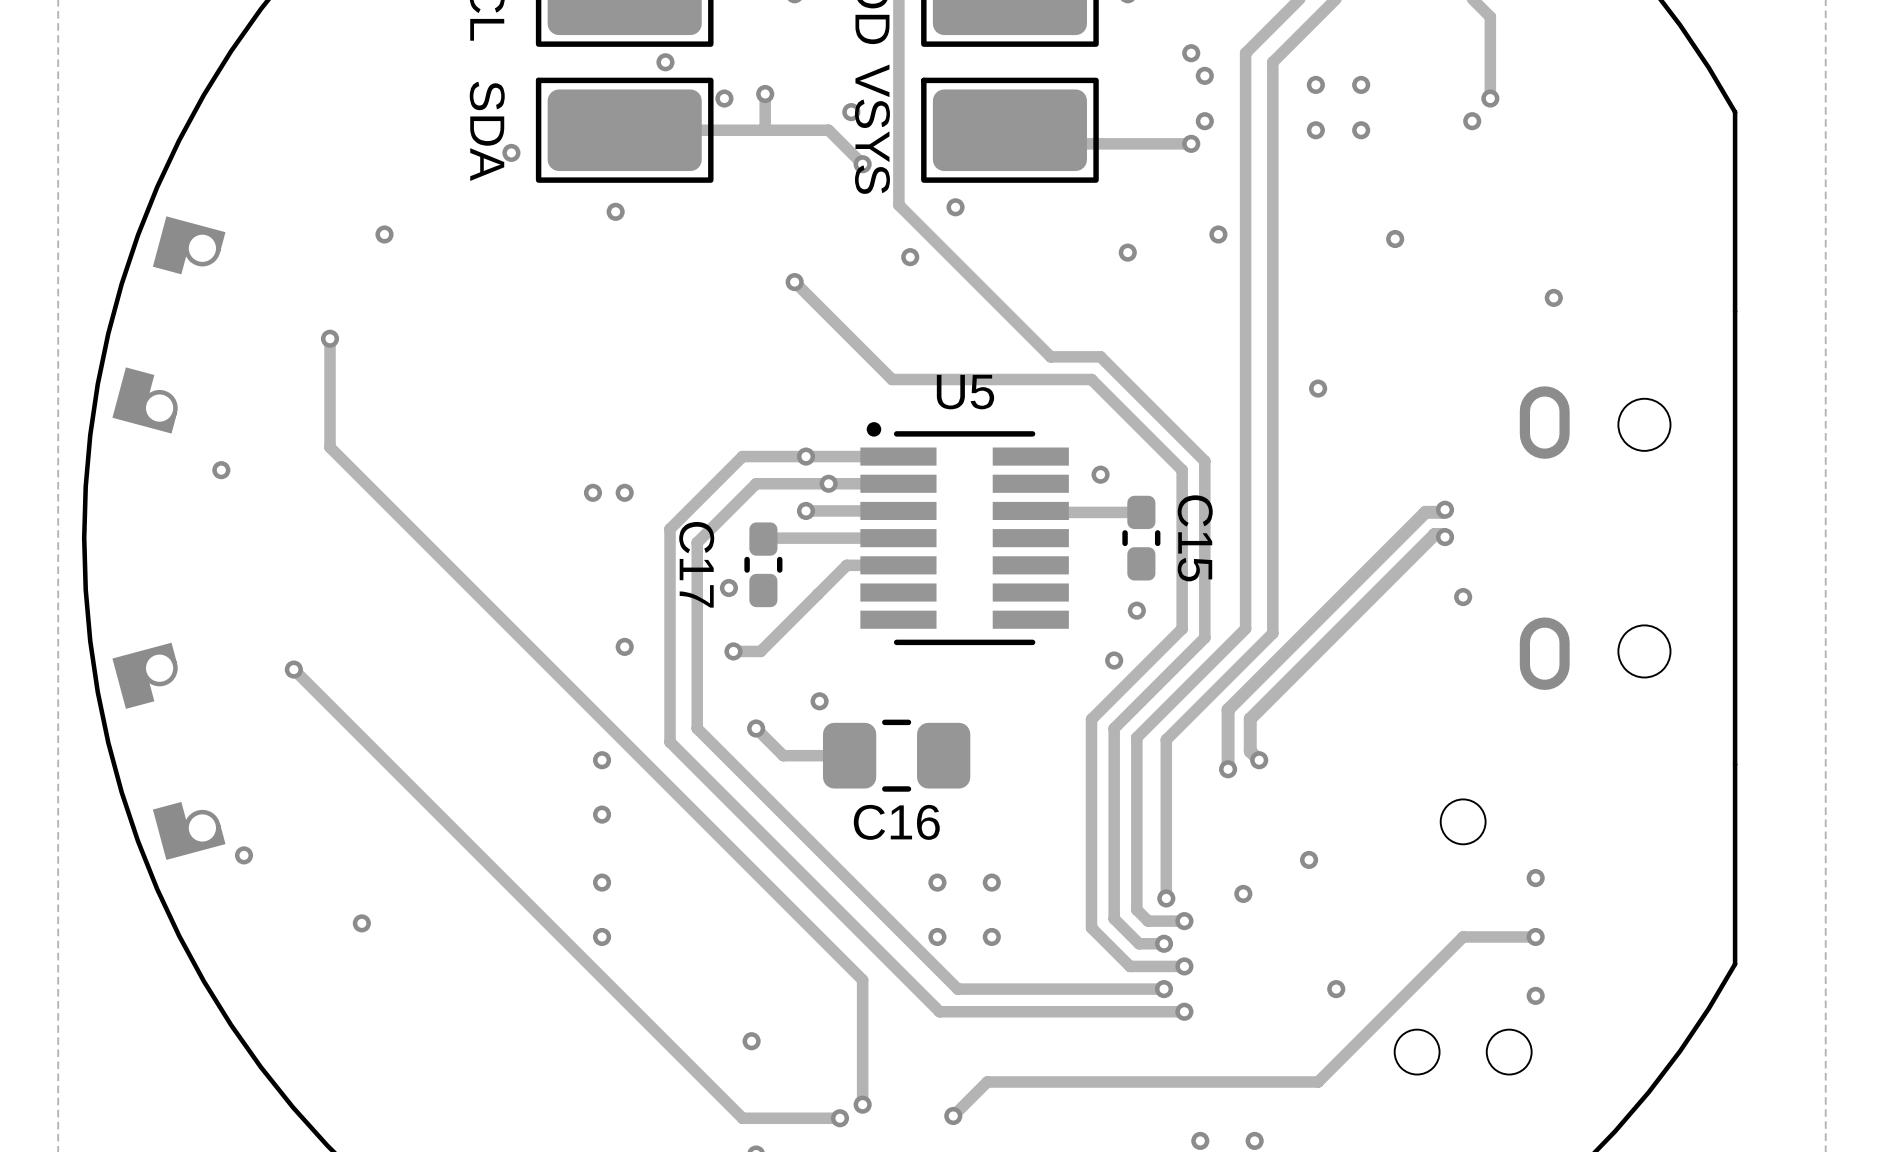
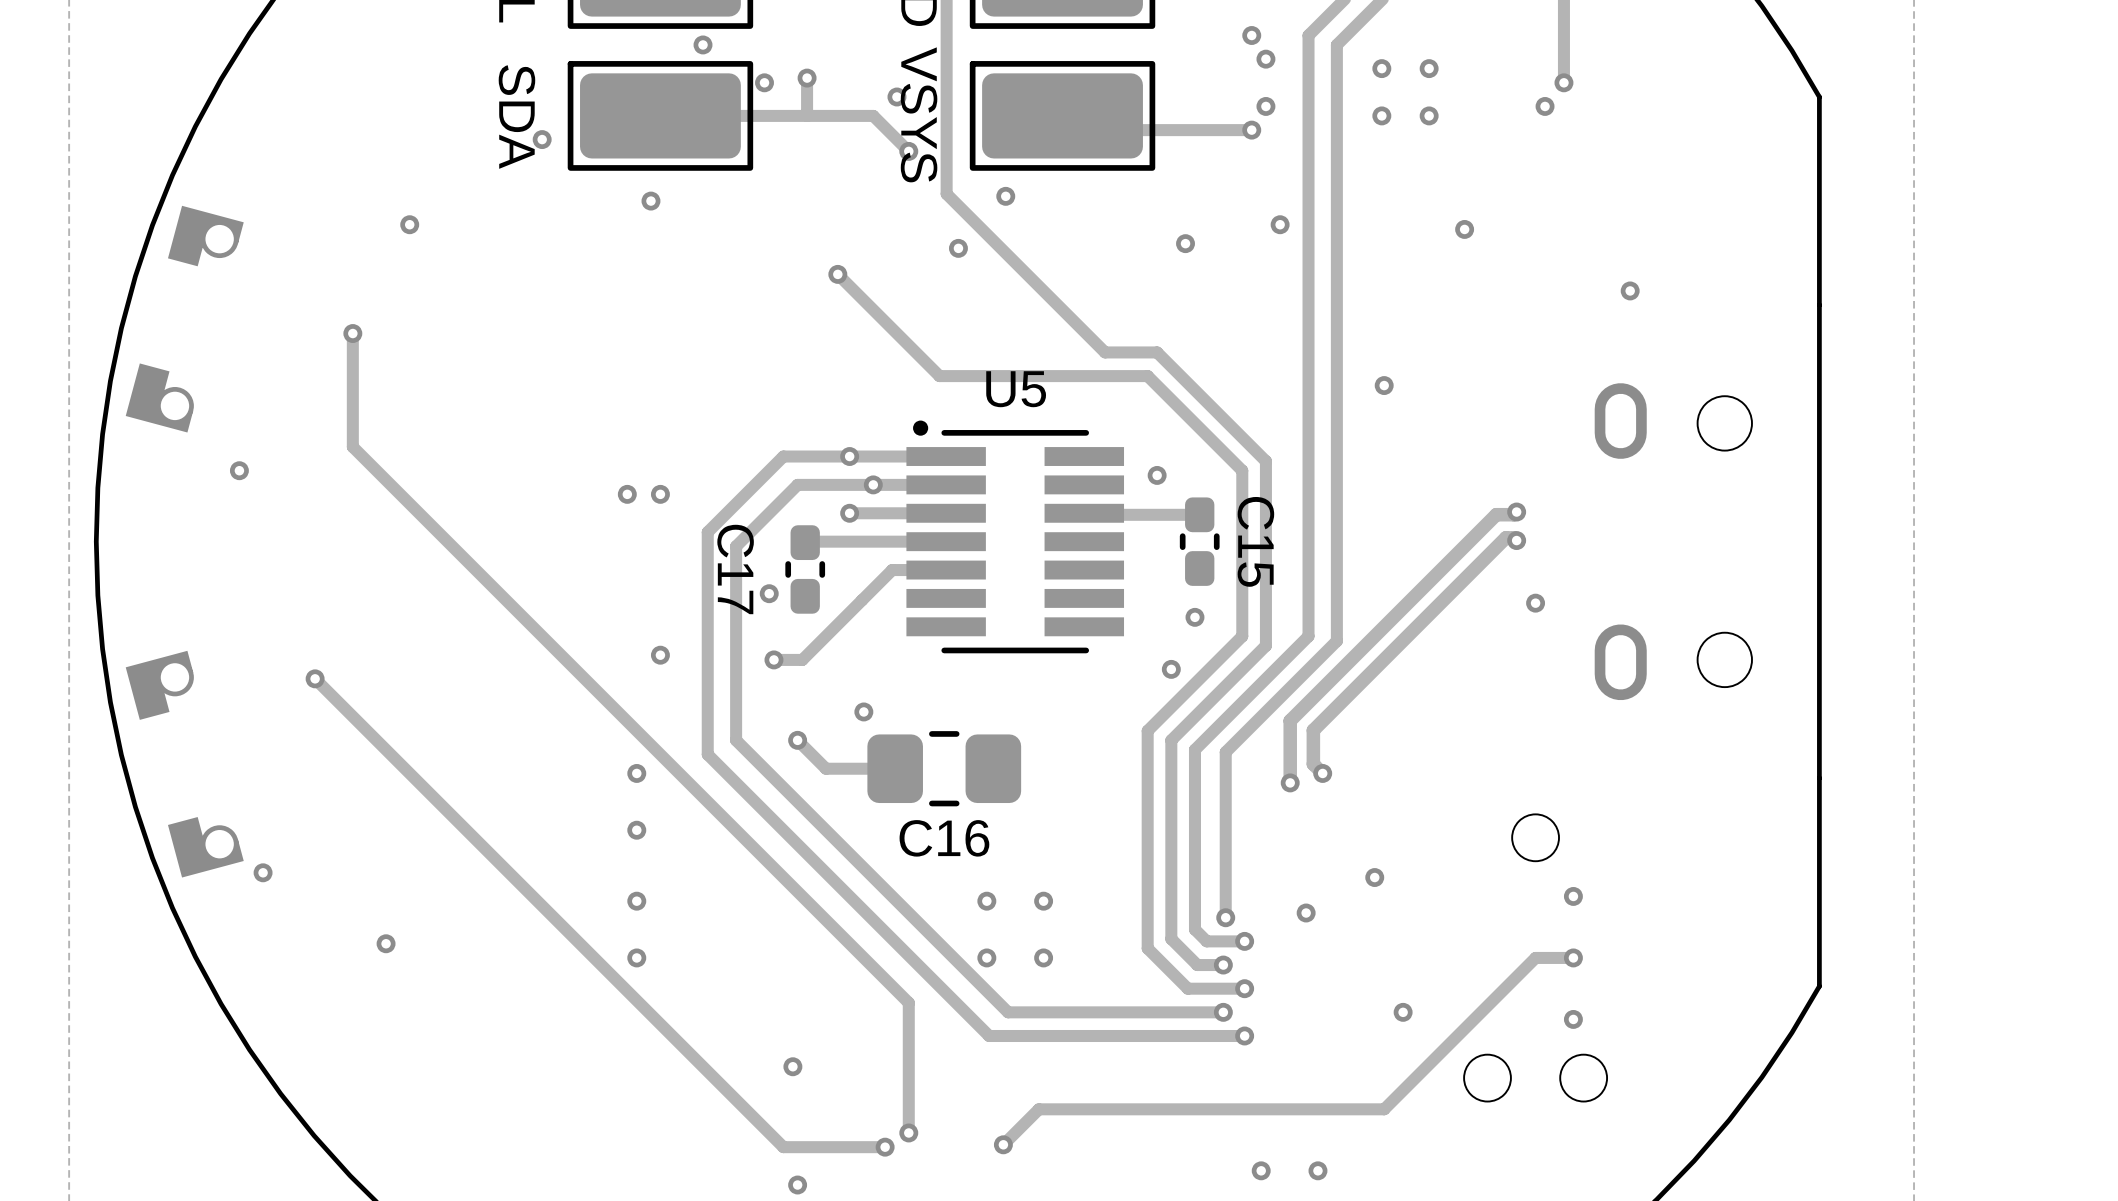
via: none -> (1573, 896)
via: (1535, 878) -> none
via: none -> (1573, 957)
track: (1535, 936) (1499, 936) -> none
via: (1535, 936) -> none
via: none -> (1573, 1019)
via: (1535, 995) -> none

